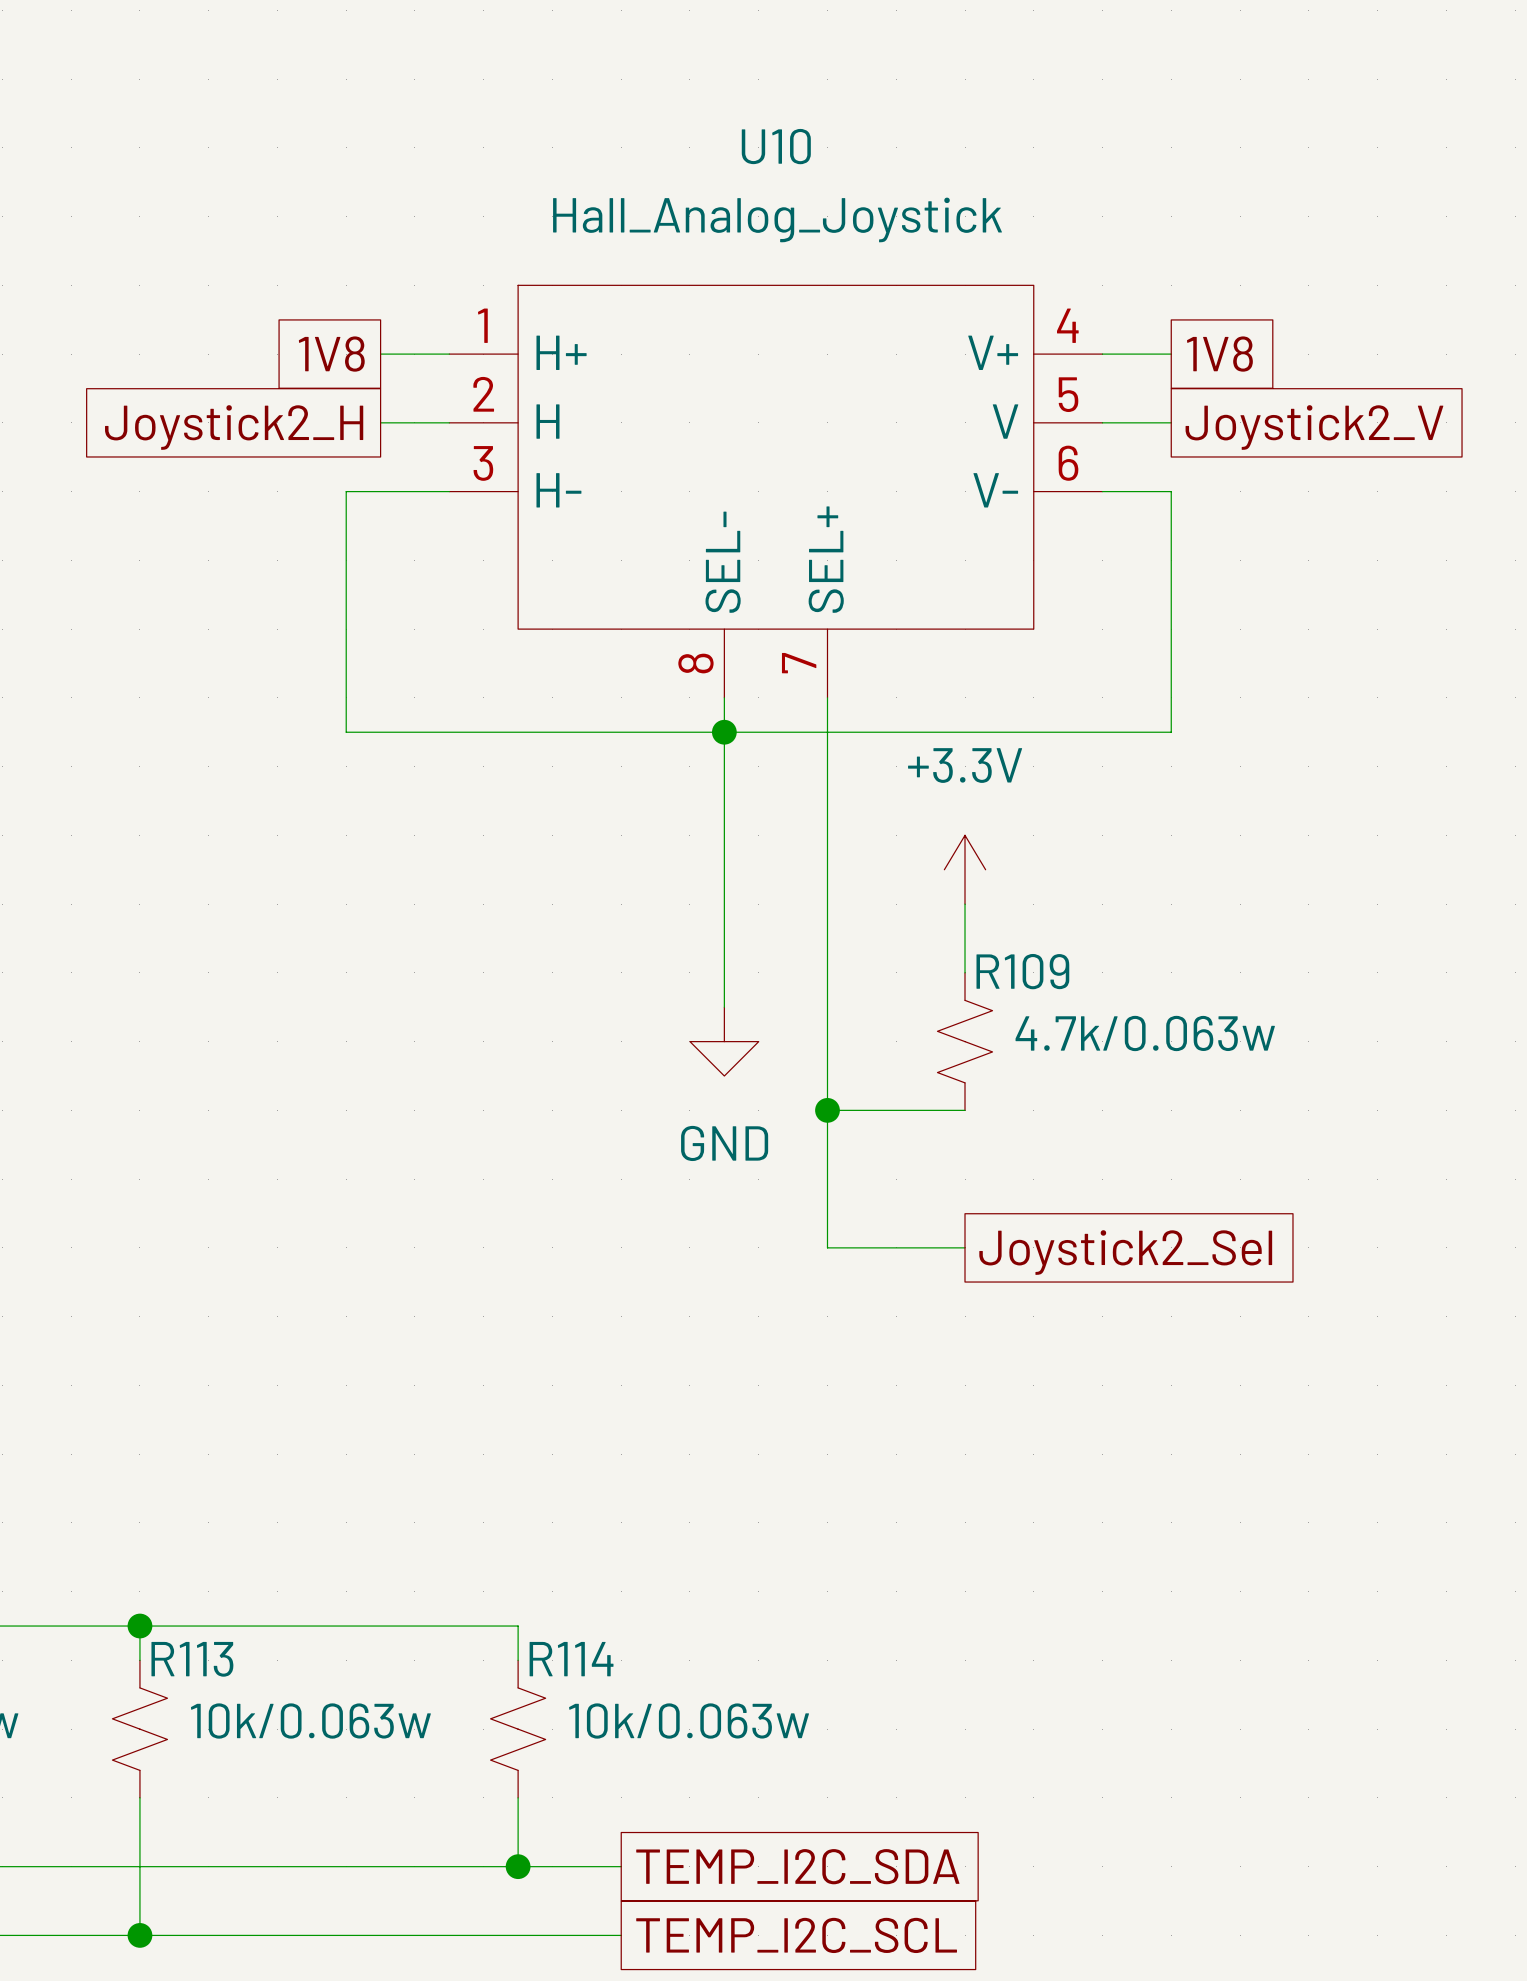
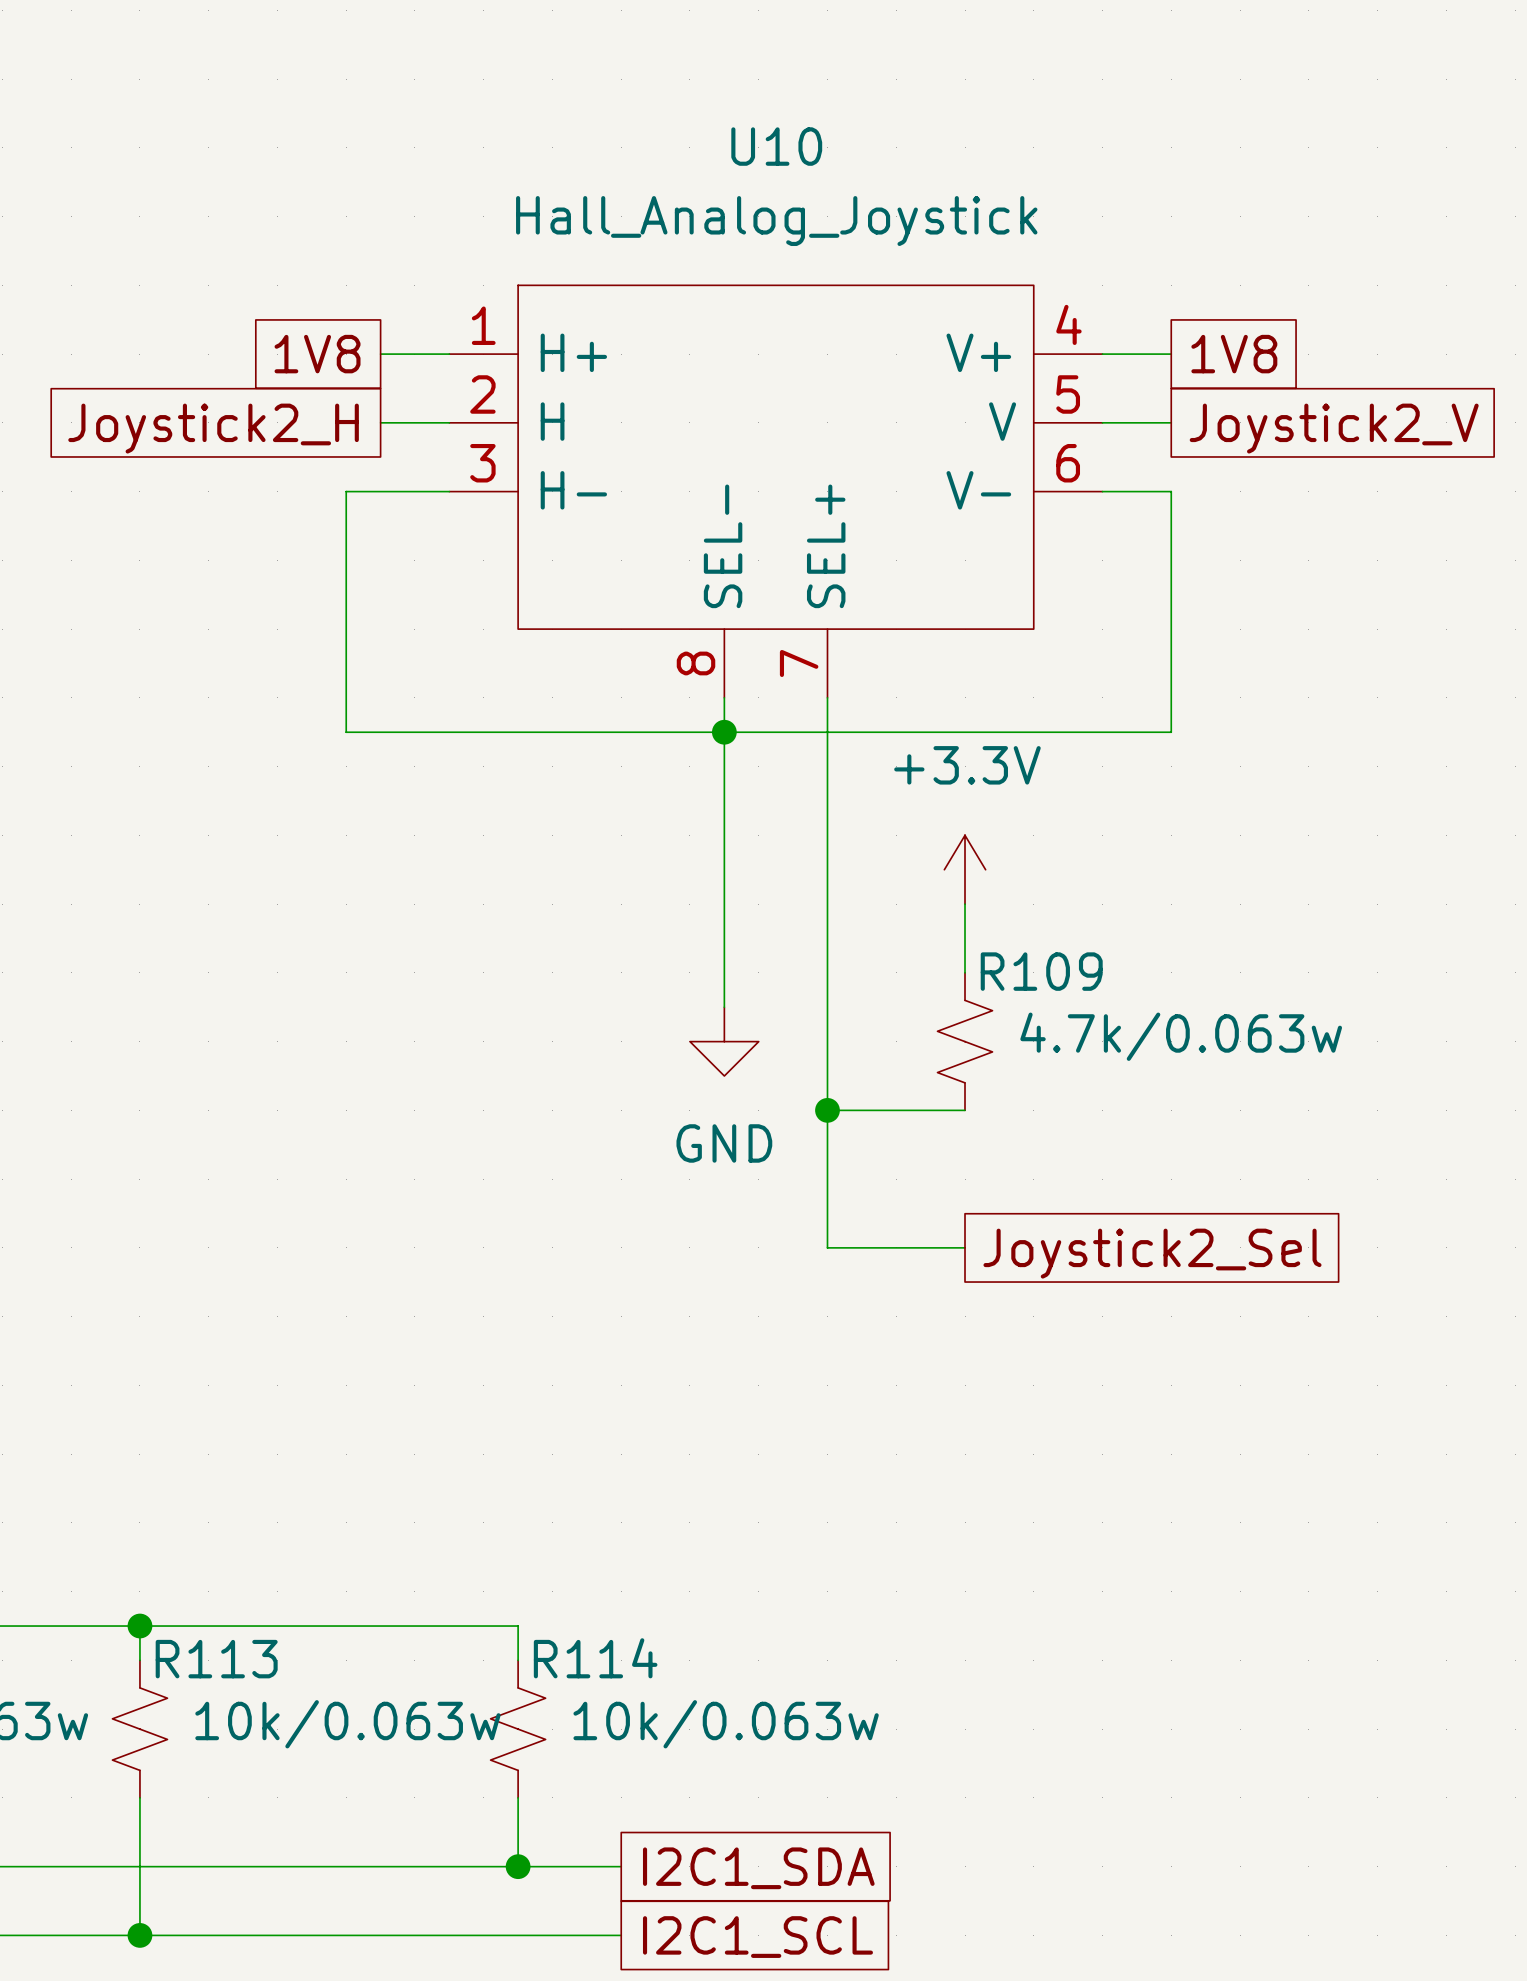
global label: TEMP_I2C_SDA (797, 1866) -> I2C1_SDA (758, 1868)
global label: TEMP_I2C_SCL (796, 1935) -> I2C1_SCL (757, 1937)

